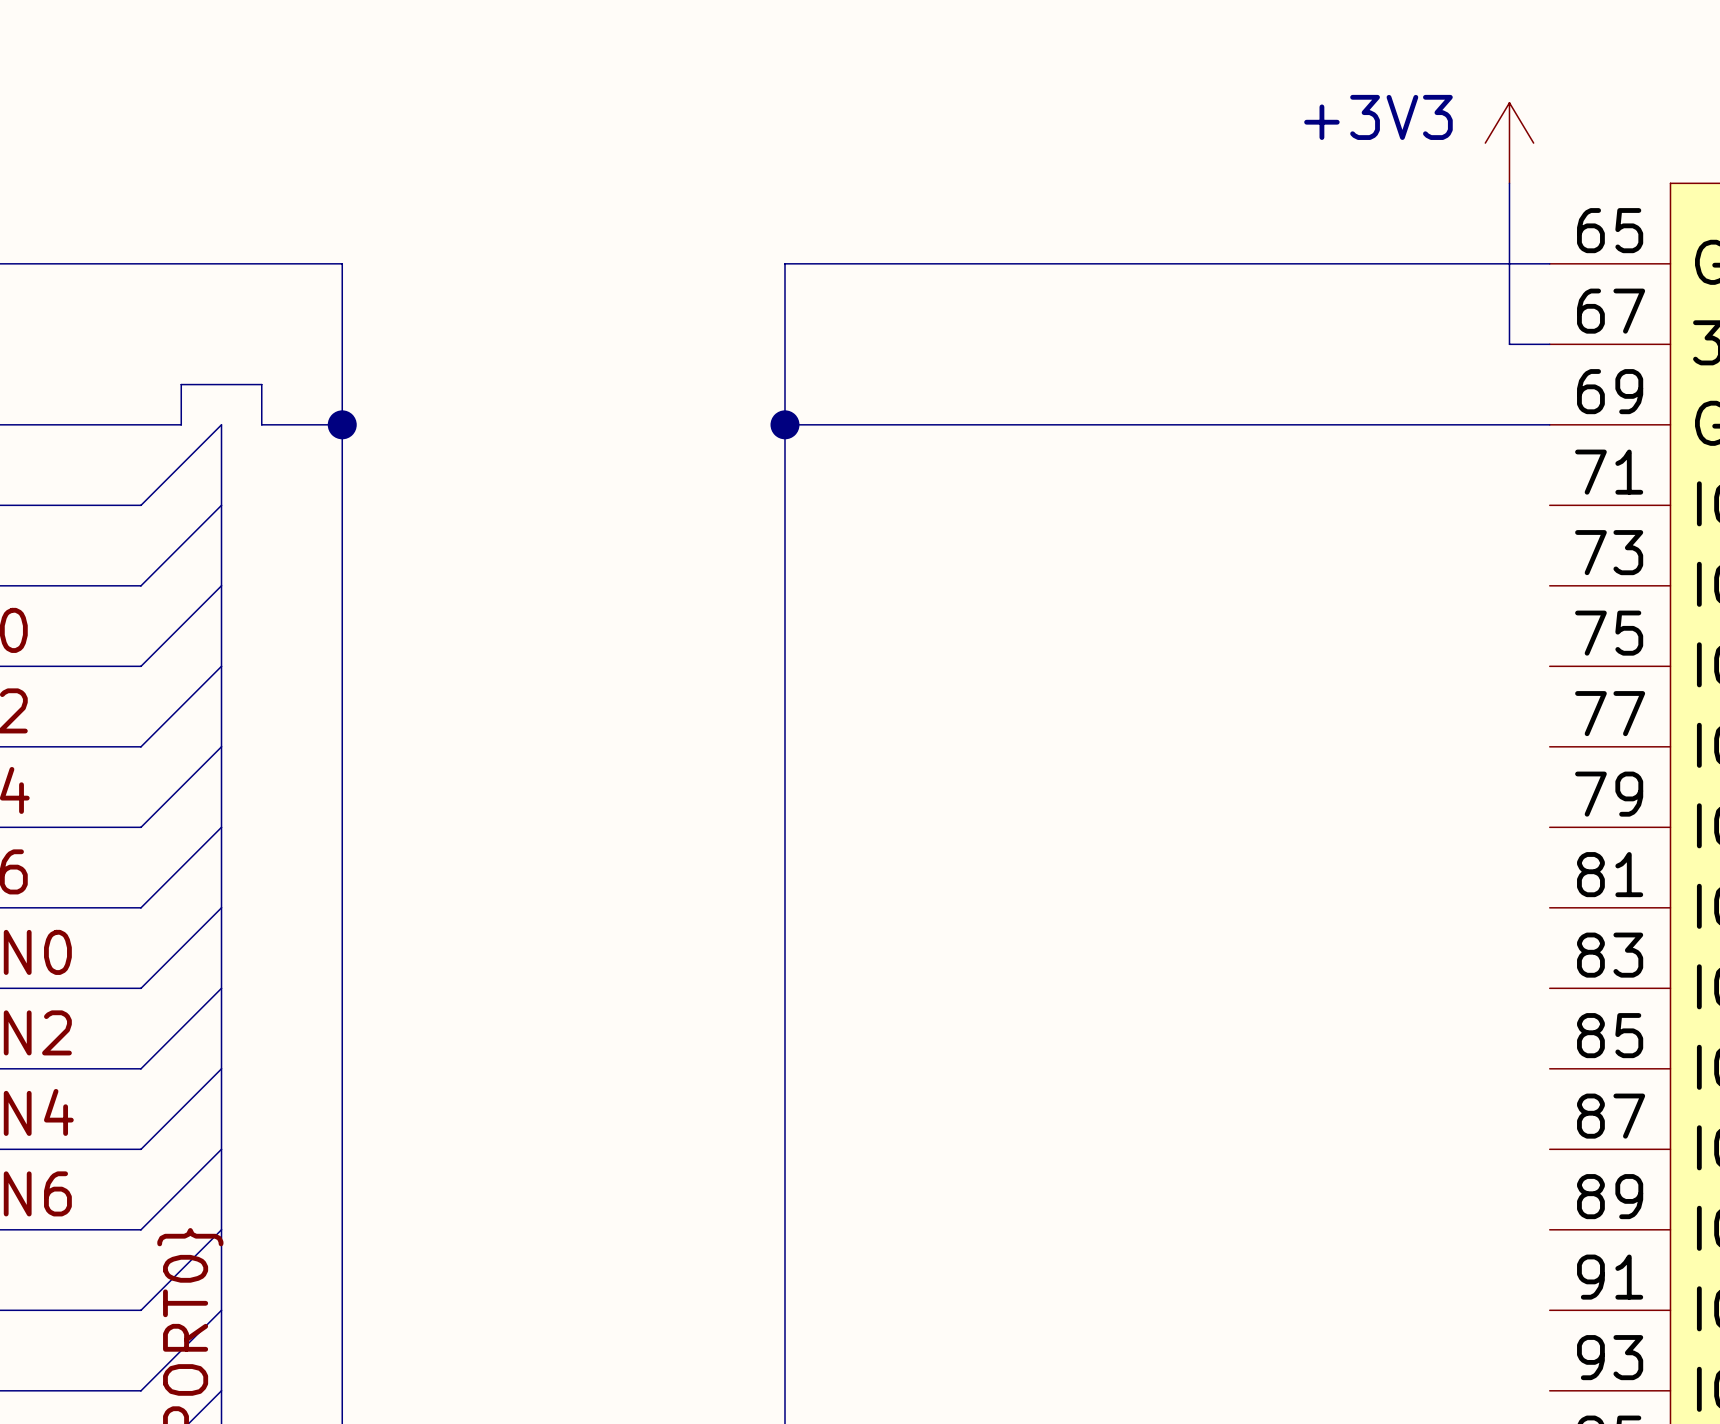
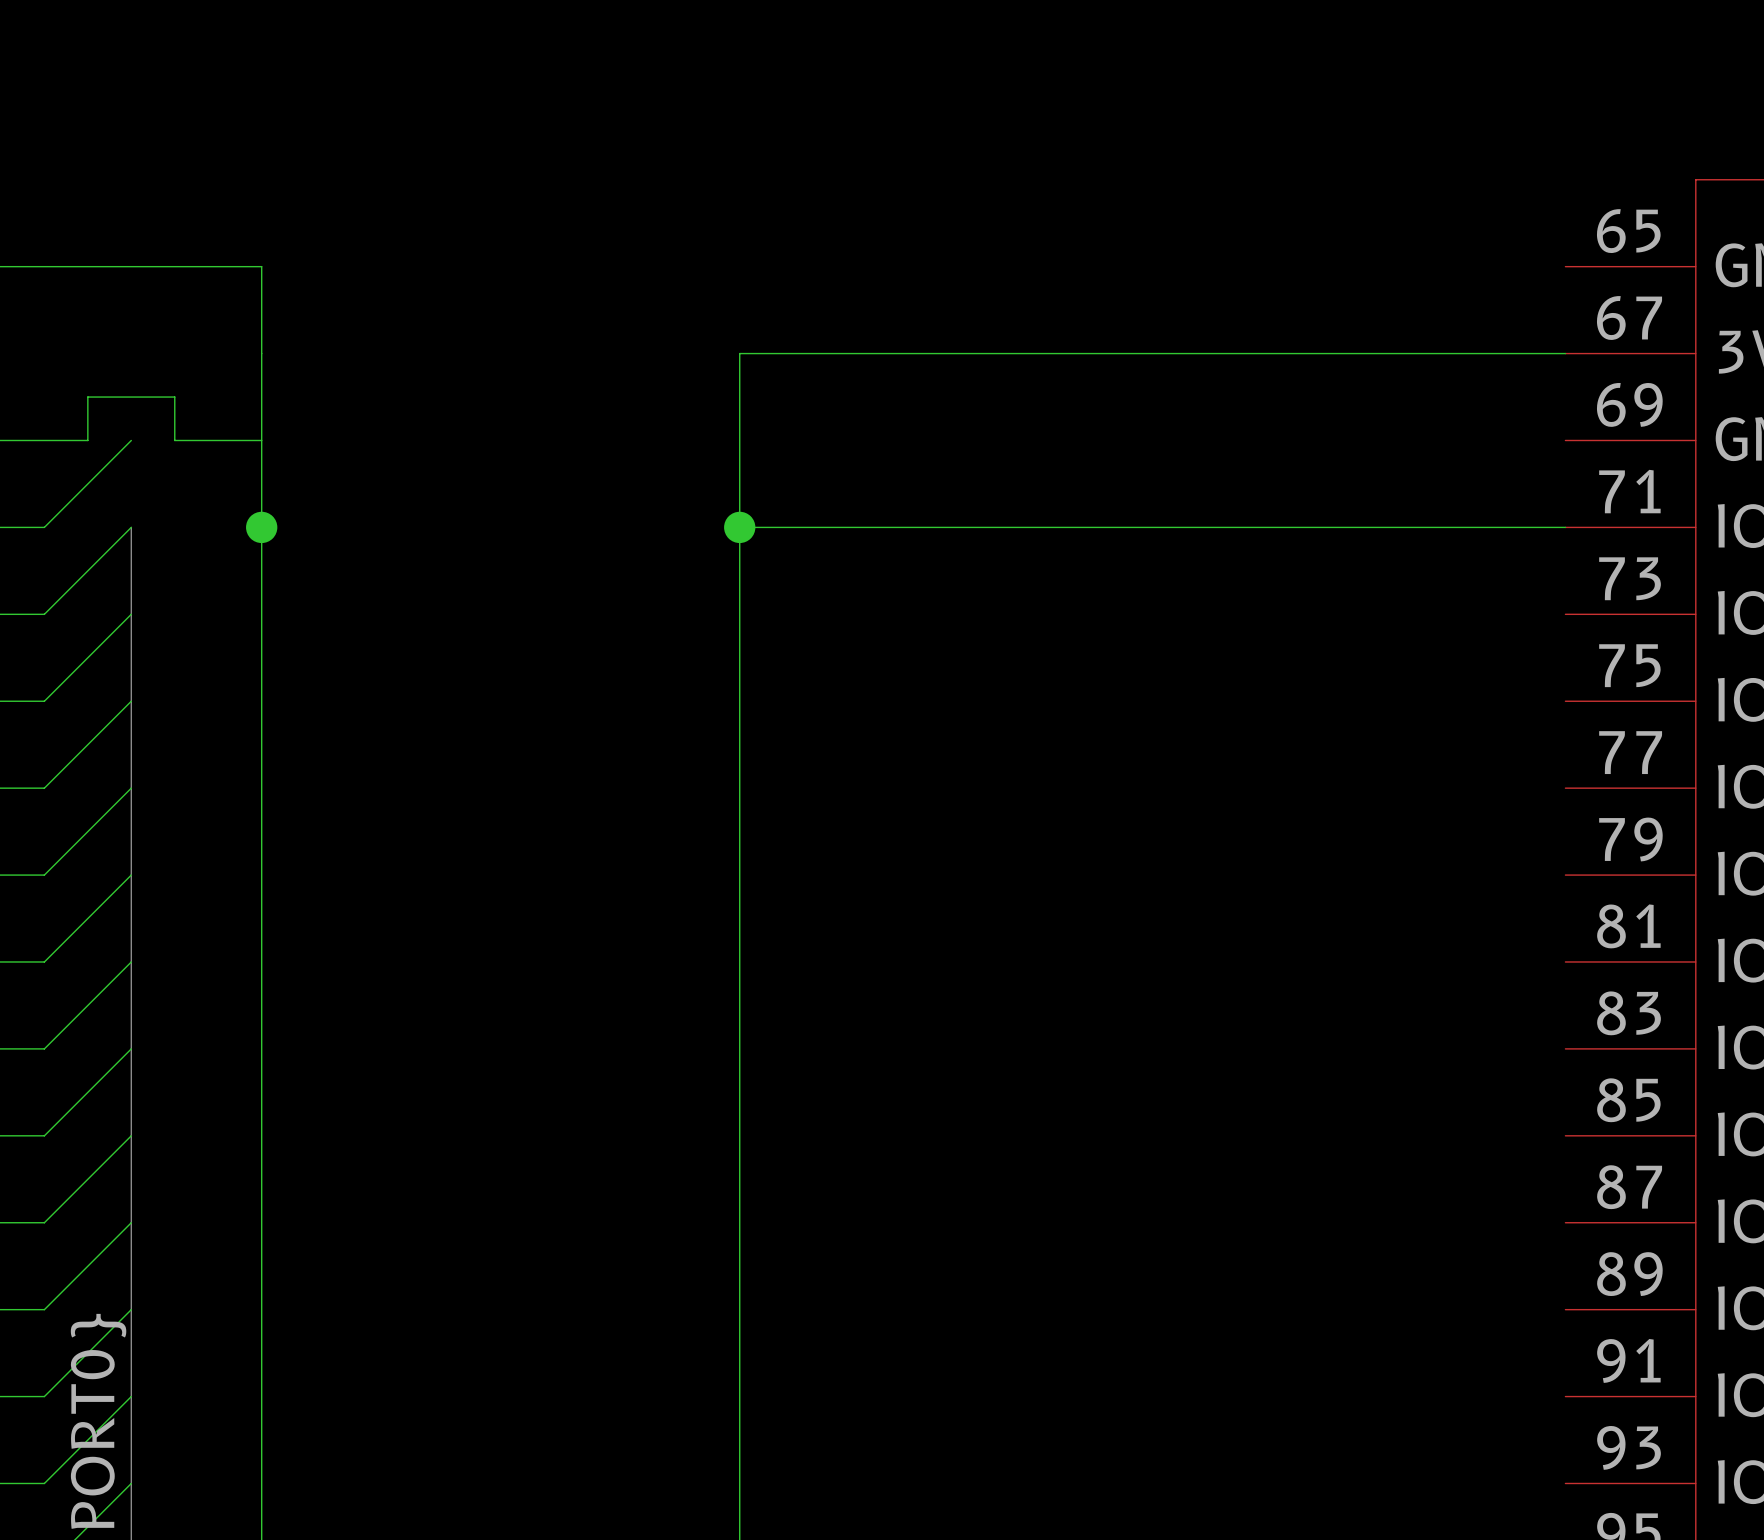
power symbol: +3V3 (1509, 143) -> none
wire: (1509, 183) (1509, 344) -> none
wire: (1549, 263) (784, 263) (784, 344) -> (1521, 353) (739, 353)
bus: (221, 424) (221, 505) -> none
junction position: (342, 424) -> (261, 527)
wire: (784, 424) (1549, 424) -> (739, 527) (1565, 527)
junction position: (784, 424) -> (739, 527)

